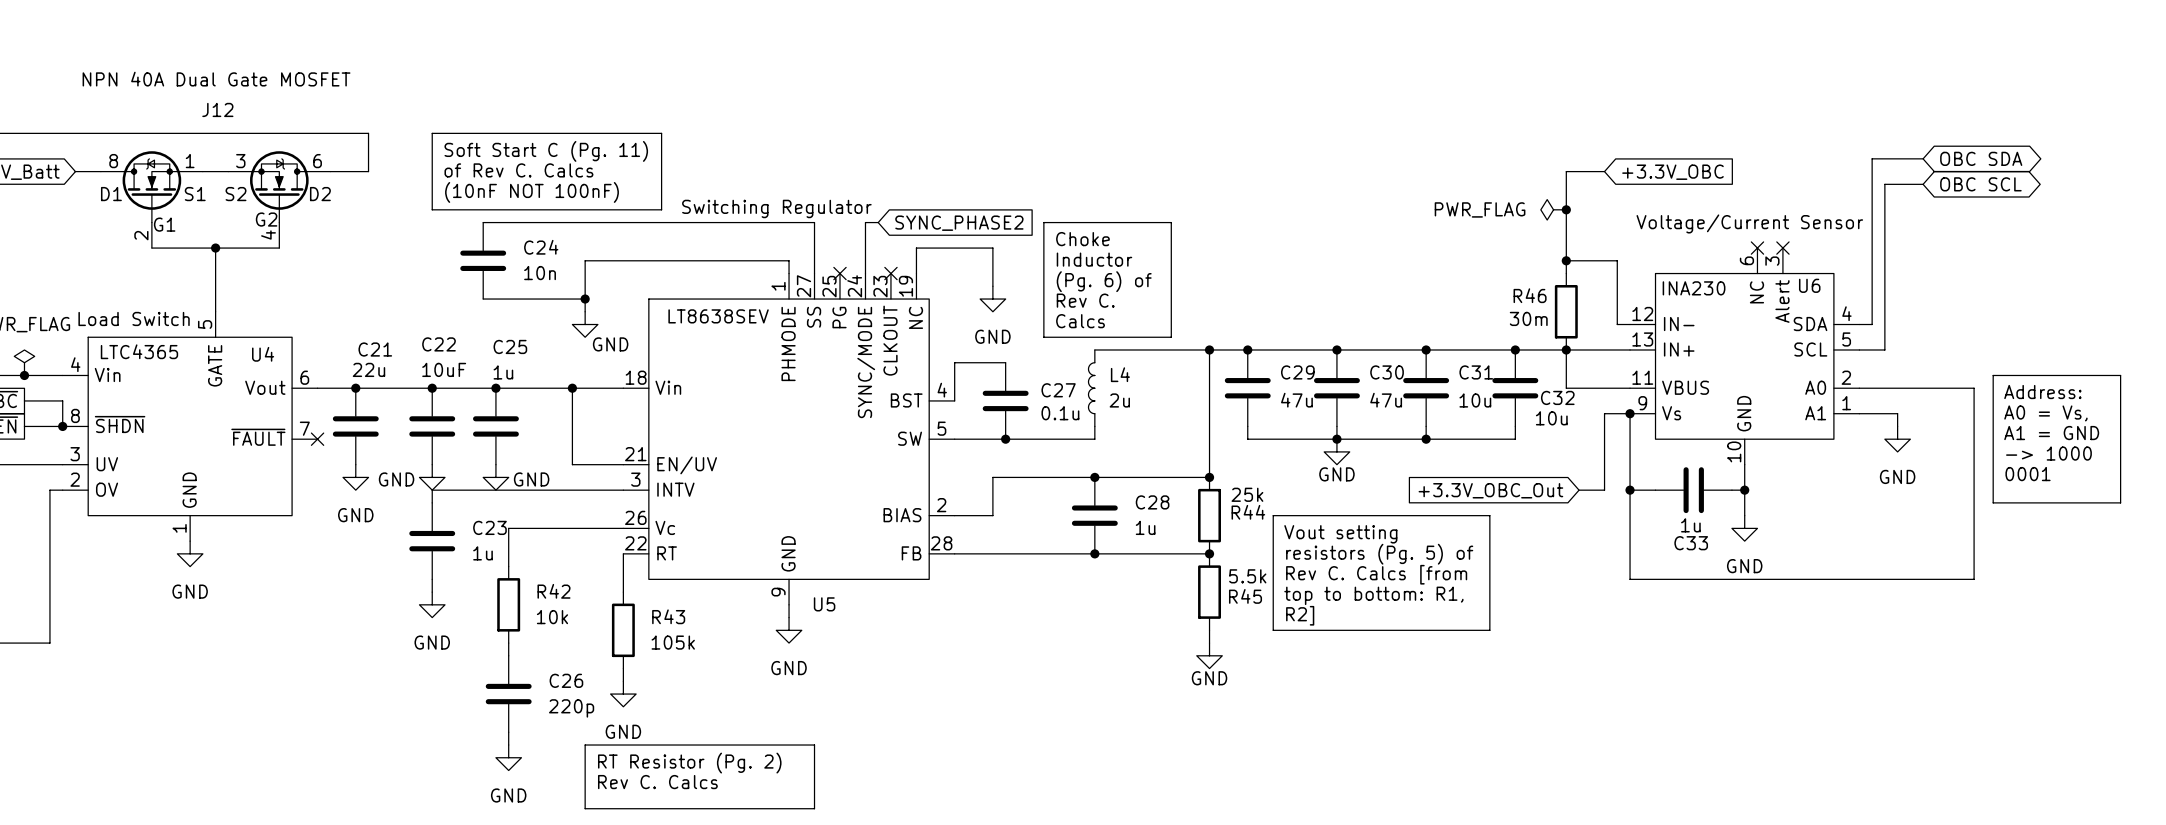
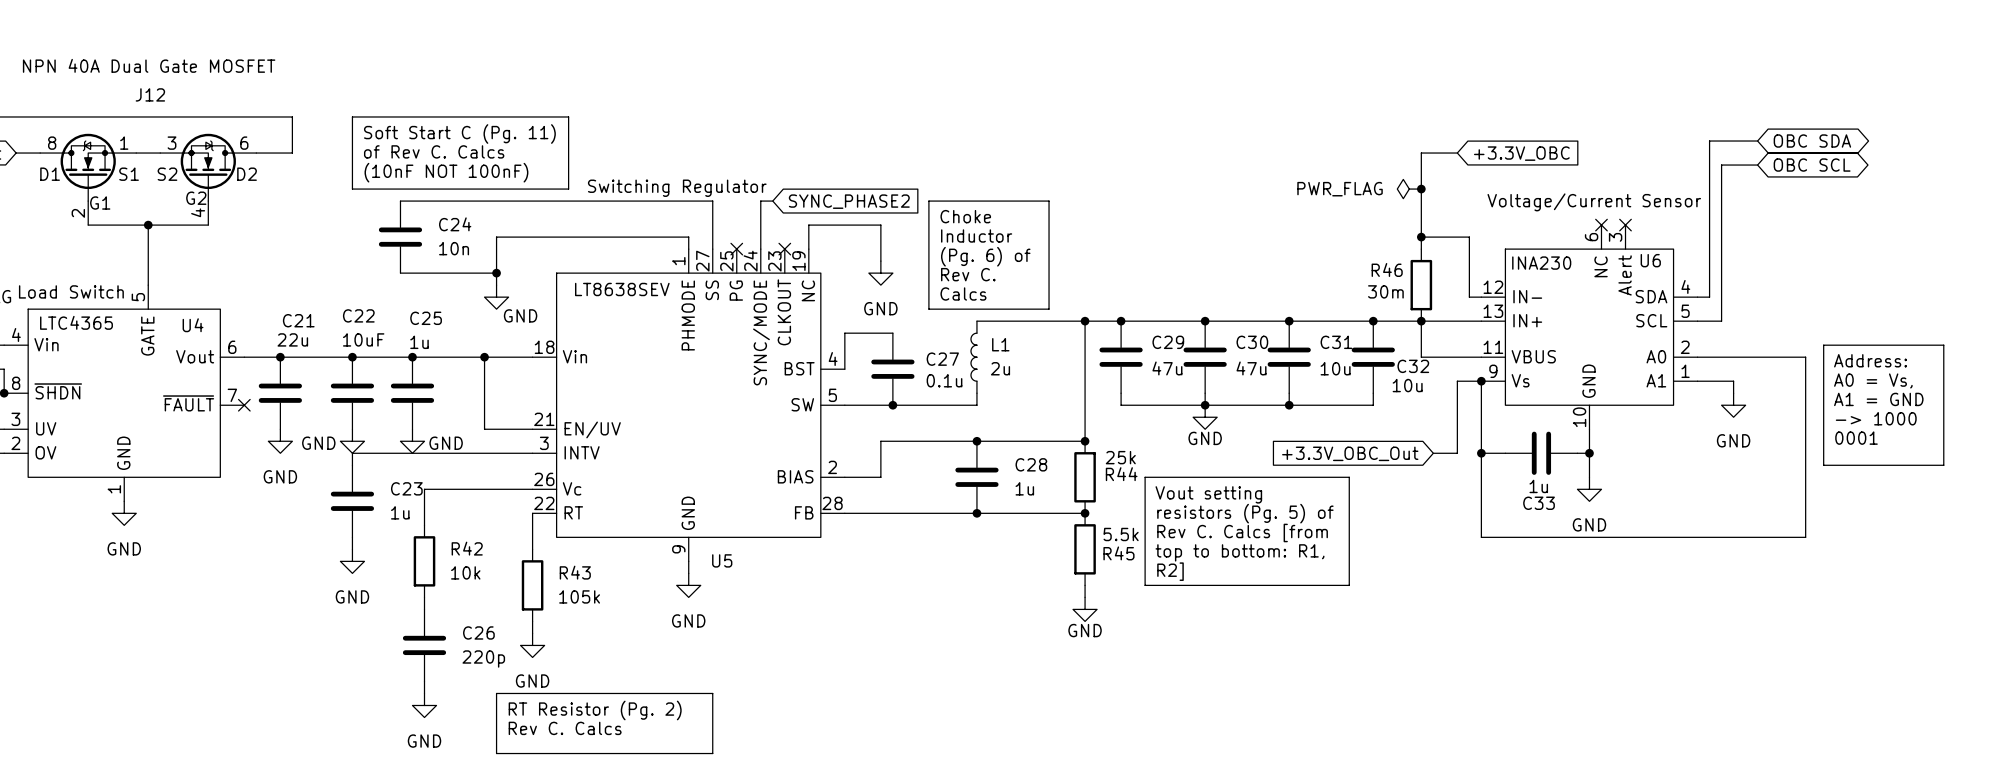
L4 name: L4 (1120, 374) -> L1 (1000, 344)

